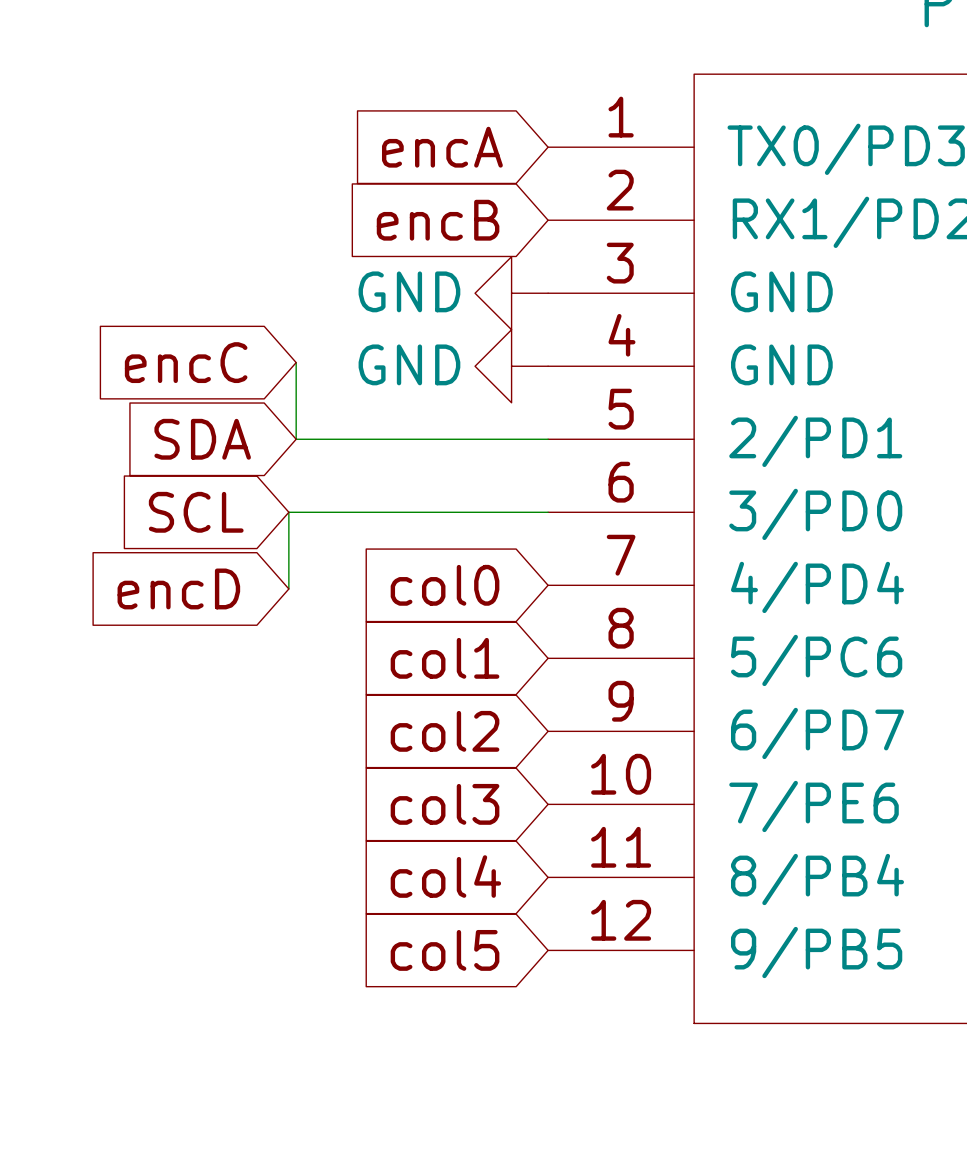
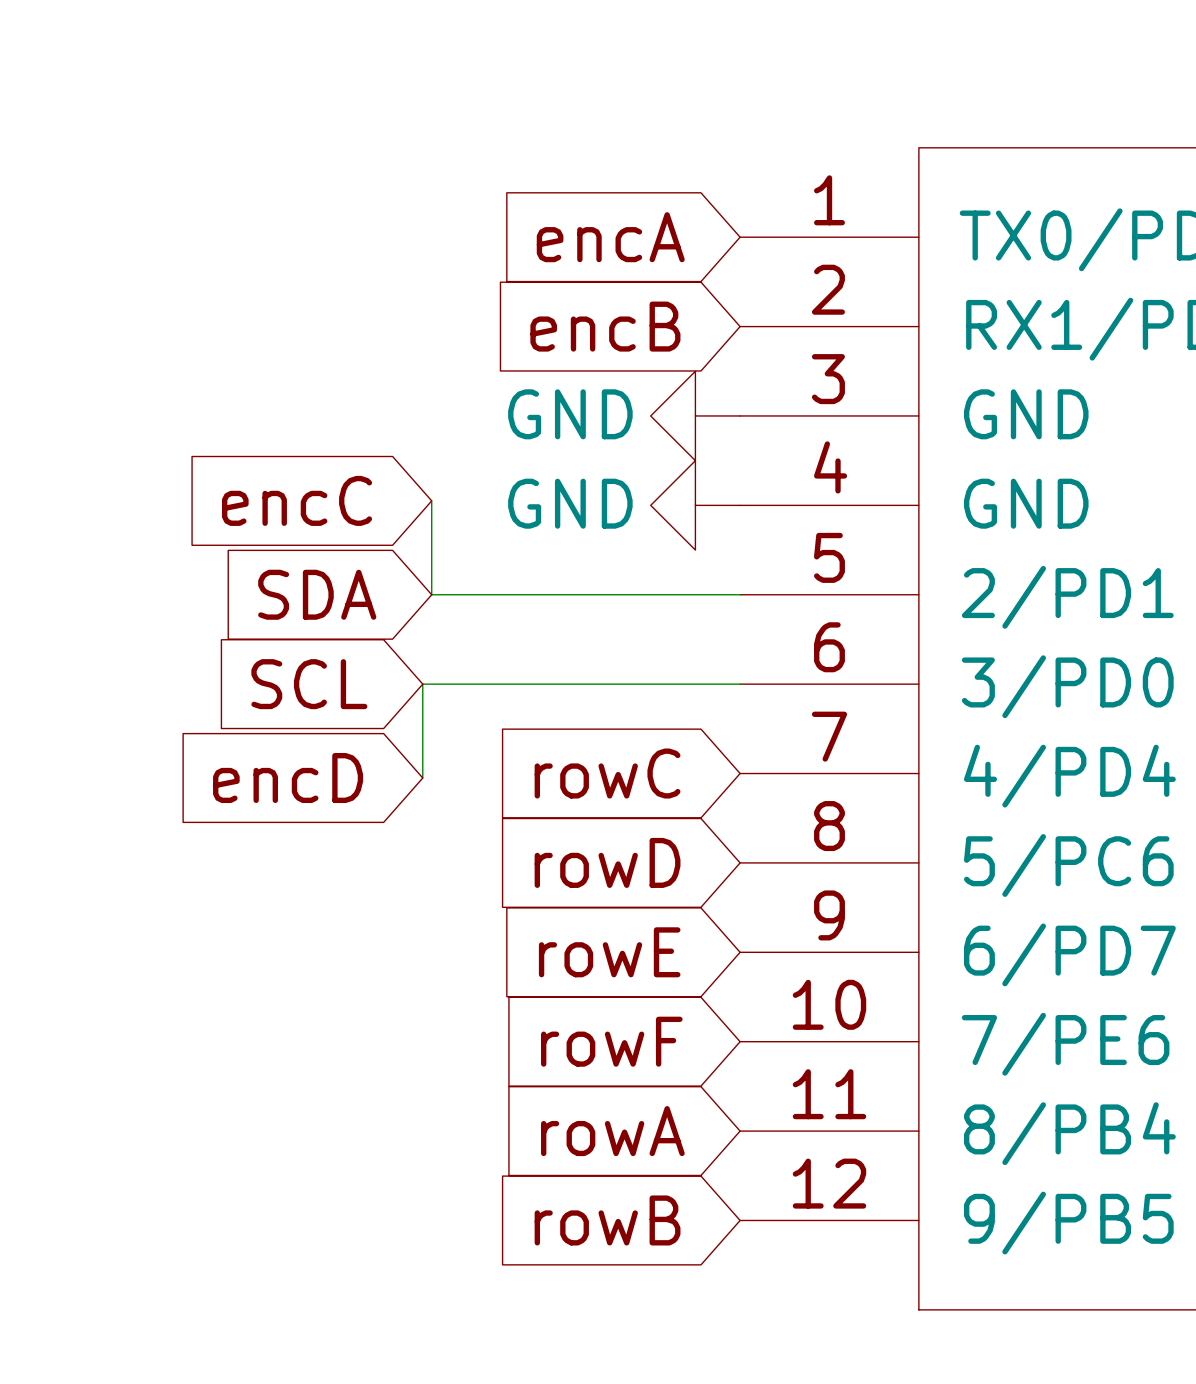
global label: col0 (445, 585) -> rowC (607, 773)
global label: col1 (445, 658) -> rowD (607, 862)
global label: col2 (445, 731) -> rowE (609, 952)
global label: col3 (445, 804) -> rowF (611, 1041)
global label: col4 (445, 876) -> rowA (612, 1131)
global label: col5 (445, 950) -> rowB (607, 1220)

